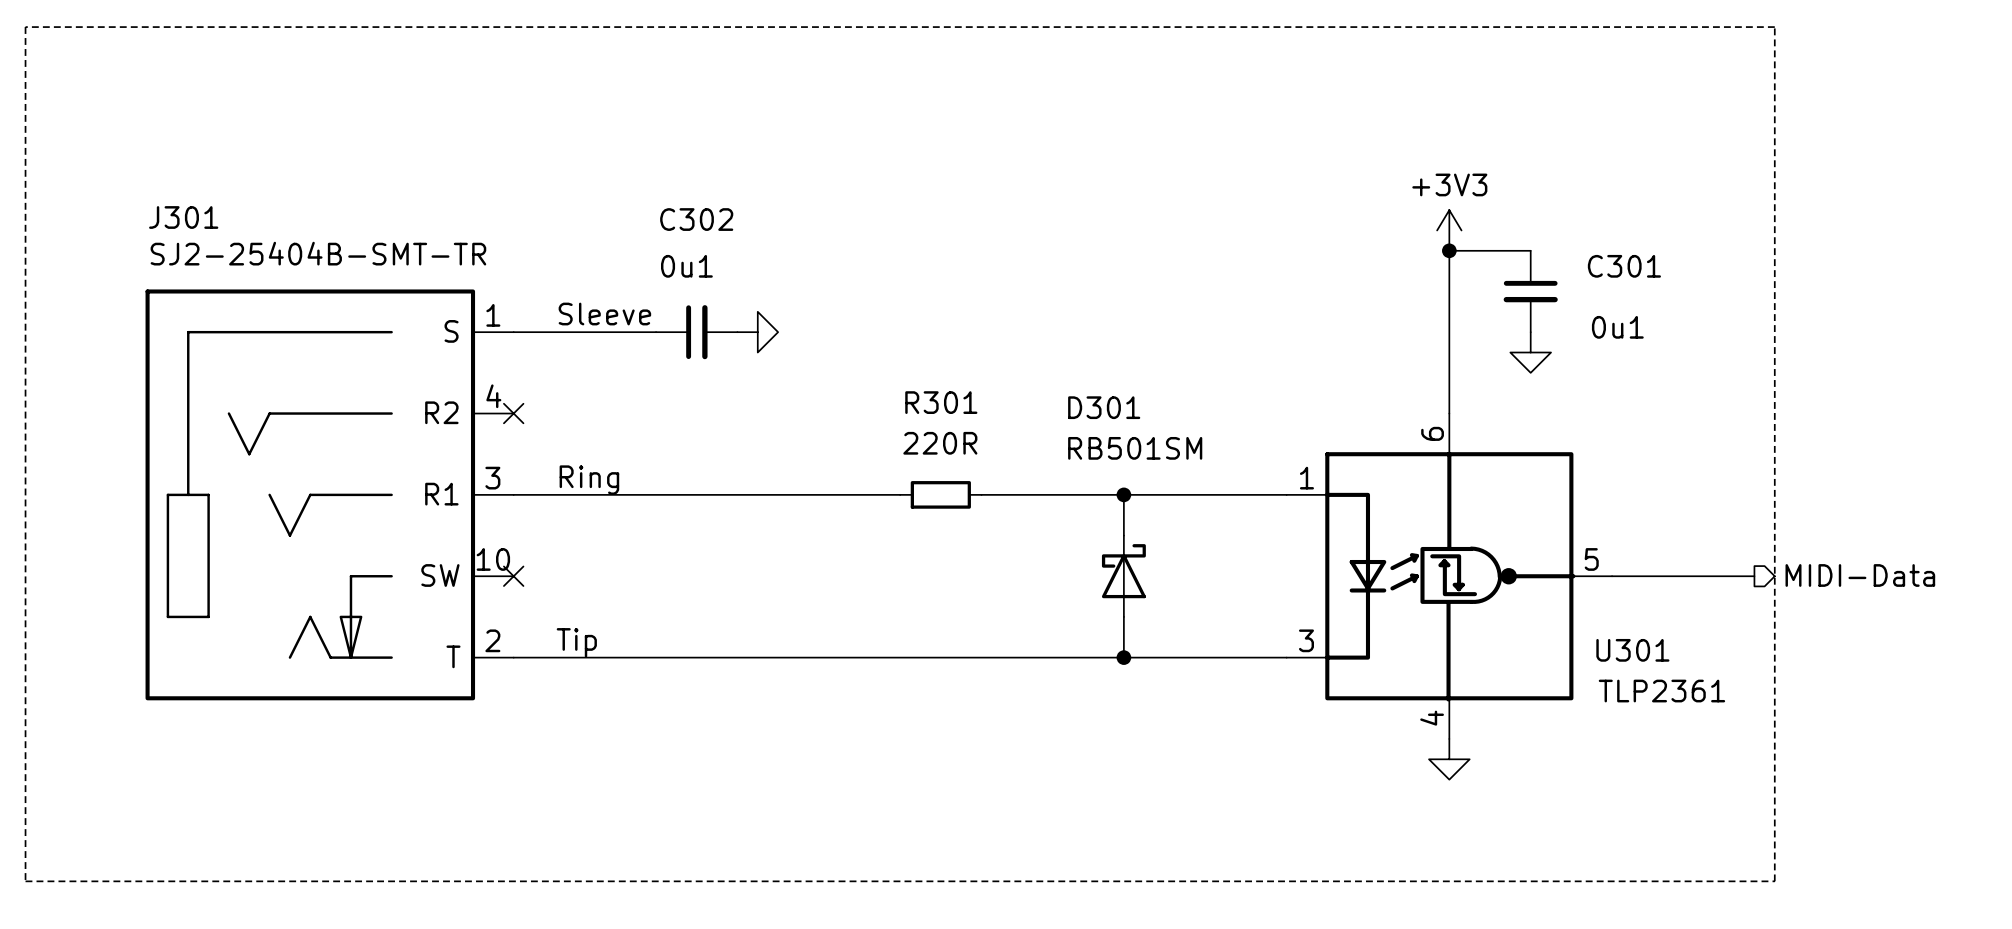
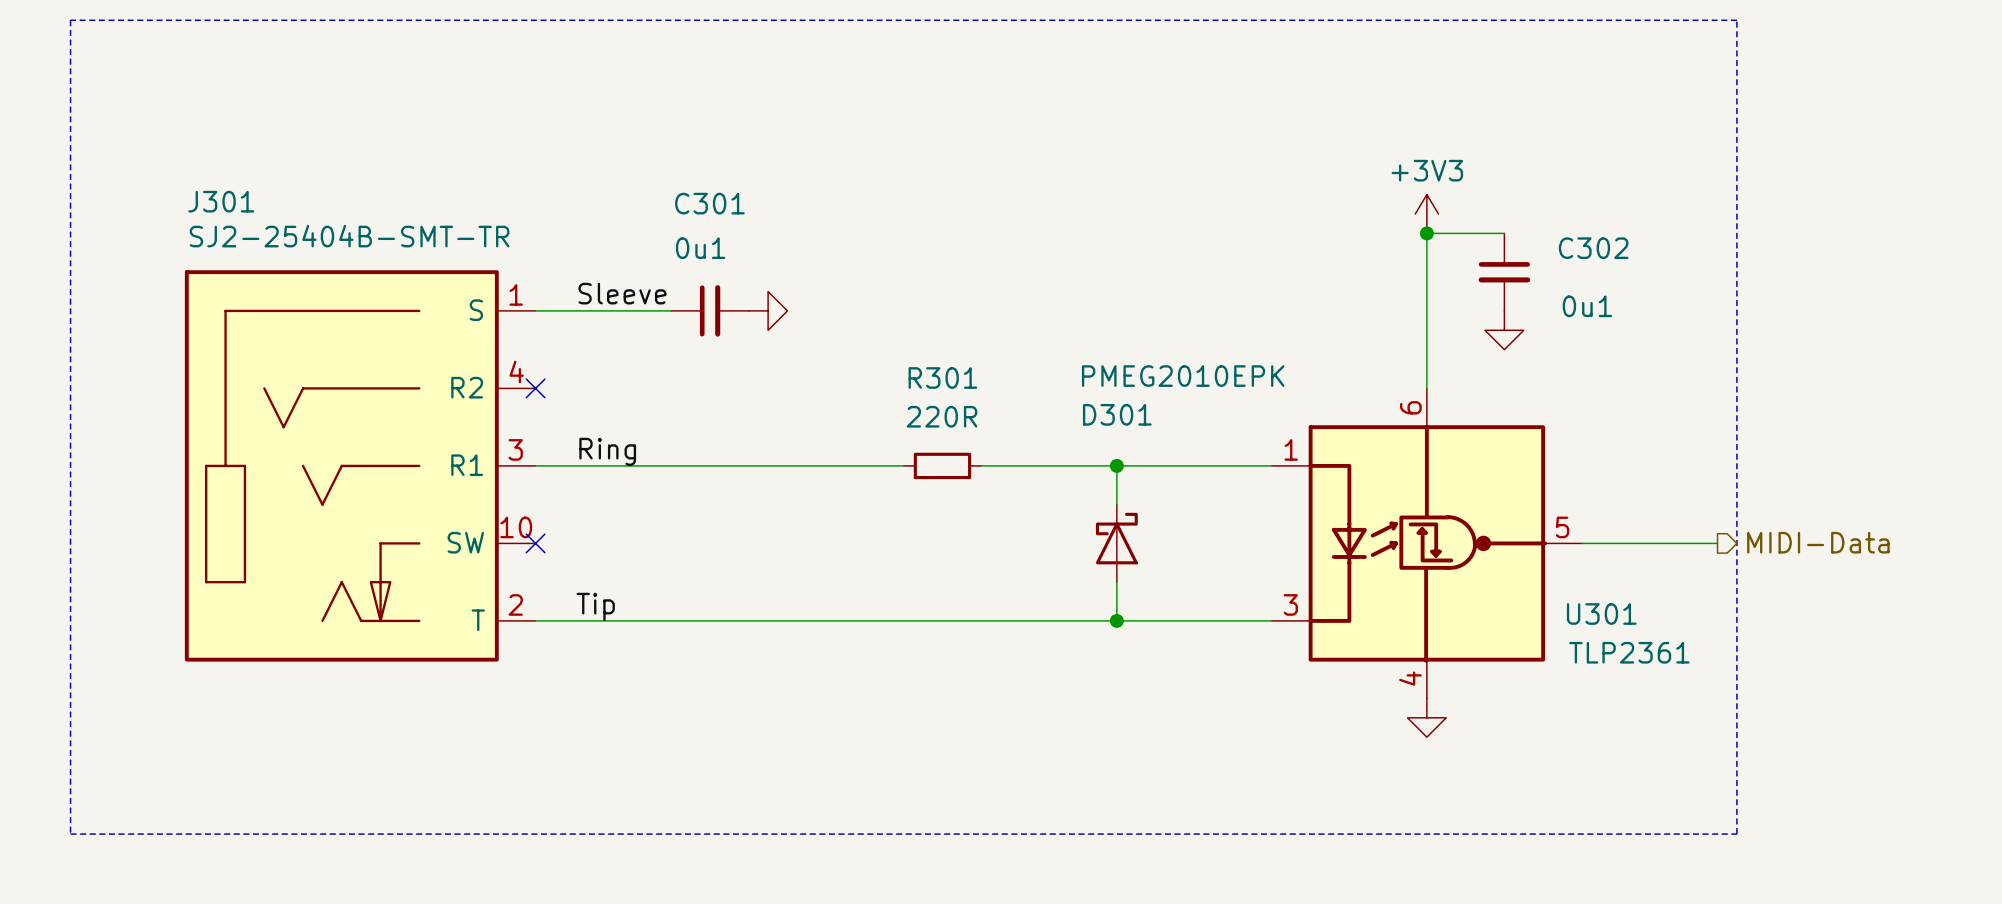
C302 name: C302 (696, 219) -> C301 (709, 203)
C301 name: C301 (1624, 266) -> C302 (1593, 248)
D301 name position: D301 (1104, 407) -> D301 (1117, 414)
D301 value: RB501SM (1135, 448) -> PMEG2010EPK (1183, 376)

